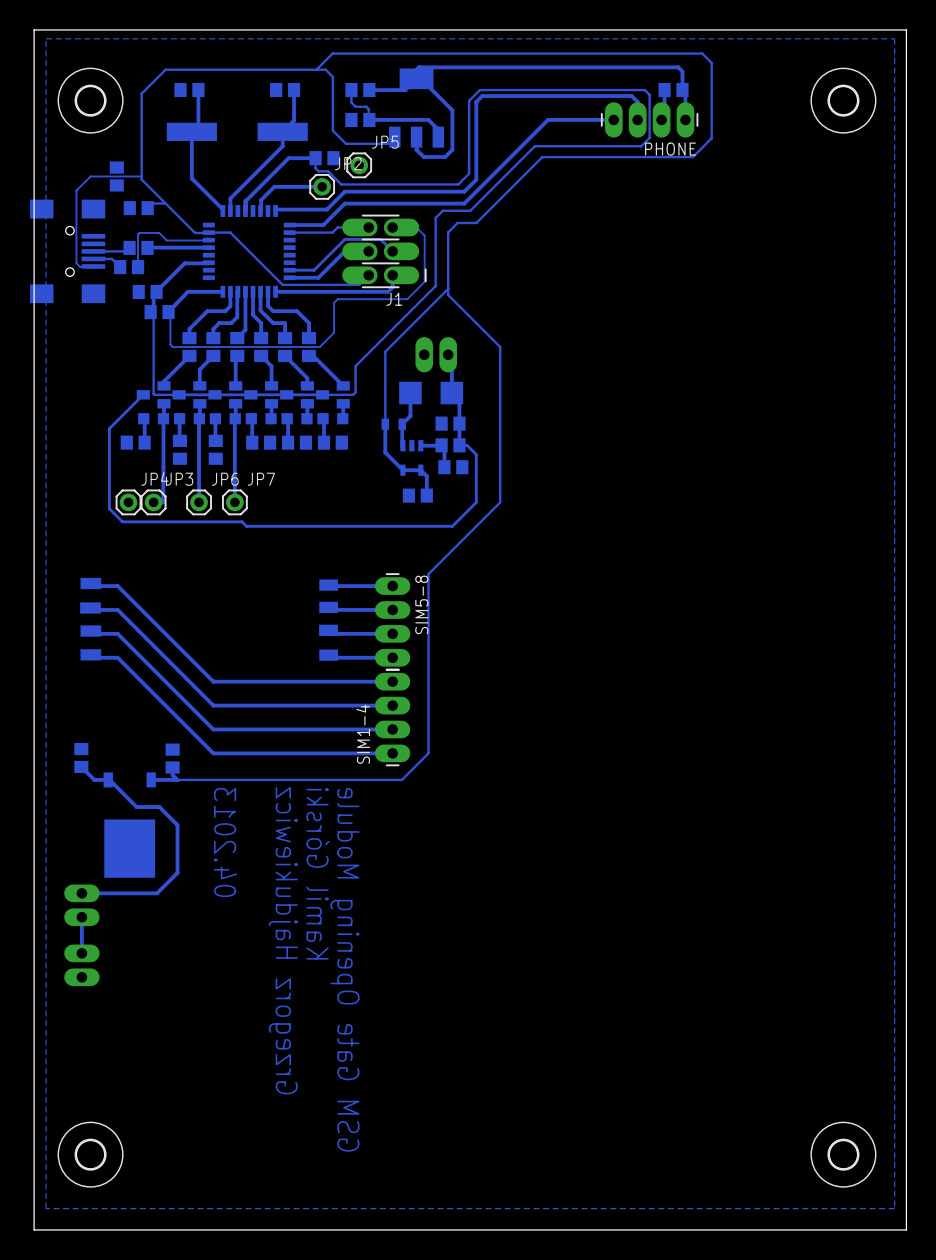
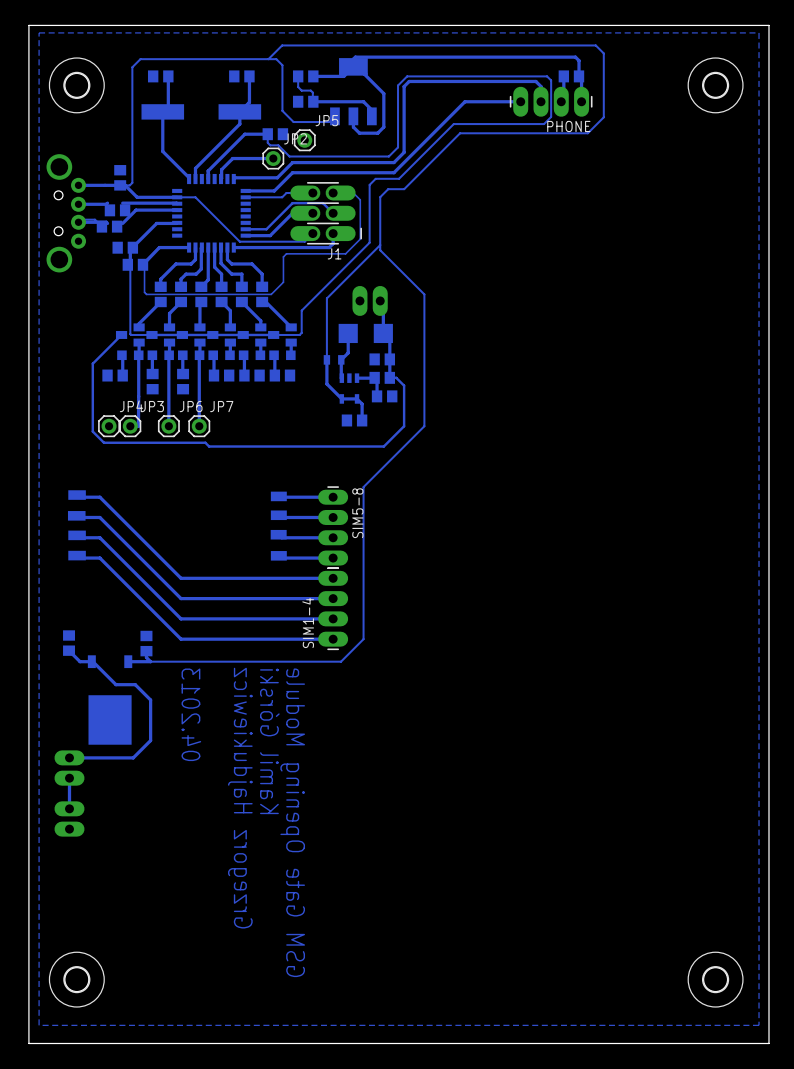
bottom track: (156, 79) (141, 93) (141, 179) (195, 232) (208, 232) -> (132, 67) (132, 182) (129, 185) (120, 185)
part: (116, 176) -> none
bottom track: (141, 176) (90, 176) (76, 190) (76, 263) (80, 266) (93, 266) -> none
bottom track: (165, 203) (152, 203) (147, 208) -> none
part rotation: 0° (138, 208) -> 90° clockwise (120, 177)
bottom track: none -> (78, 185) (120, 185)
bottom track: none -> (120, 185) (125, 185) (137, 197) (177, 197)
bottom track: none -> (107, 203) (78, 204)
bottom track: (208, 239) (166, 240) (159, 232) (139, 232) (138, 267) -> (176, 203) (122, 203)
bottom track: (129, 247) (126, 251) (93, 251) -> none
bottom track: (147, 247) (160, 247) -> (122, 223) (136, 210)
part: (67, 251) -> none
part: none -> (66, 213)
bottom track: none -> (78, 222) (107, 223)

